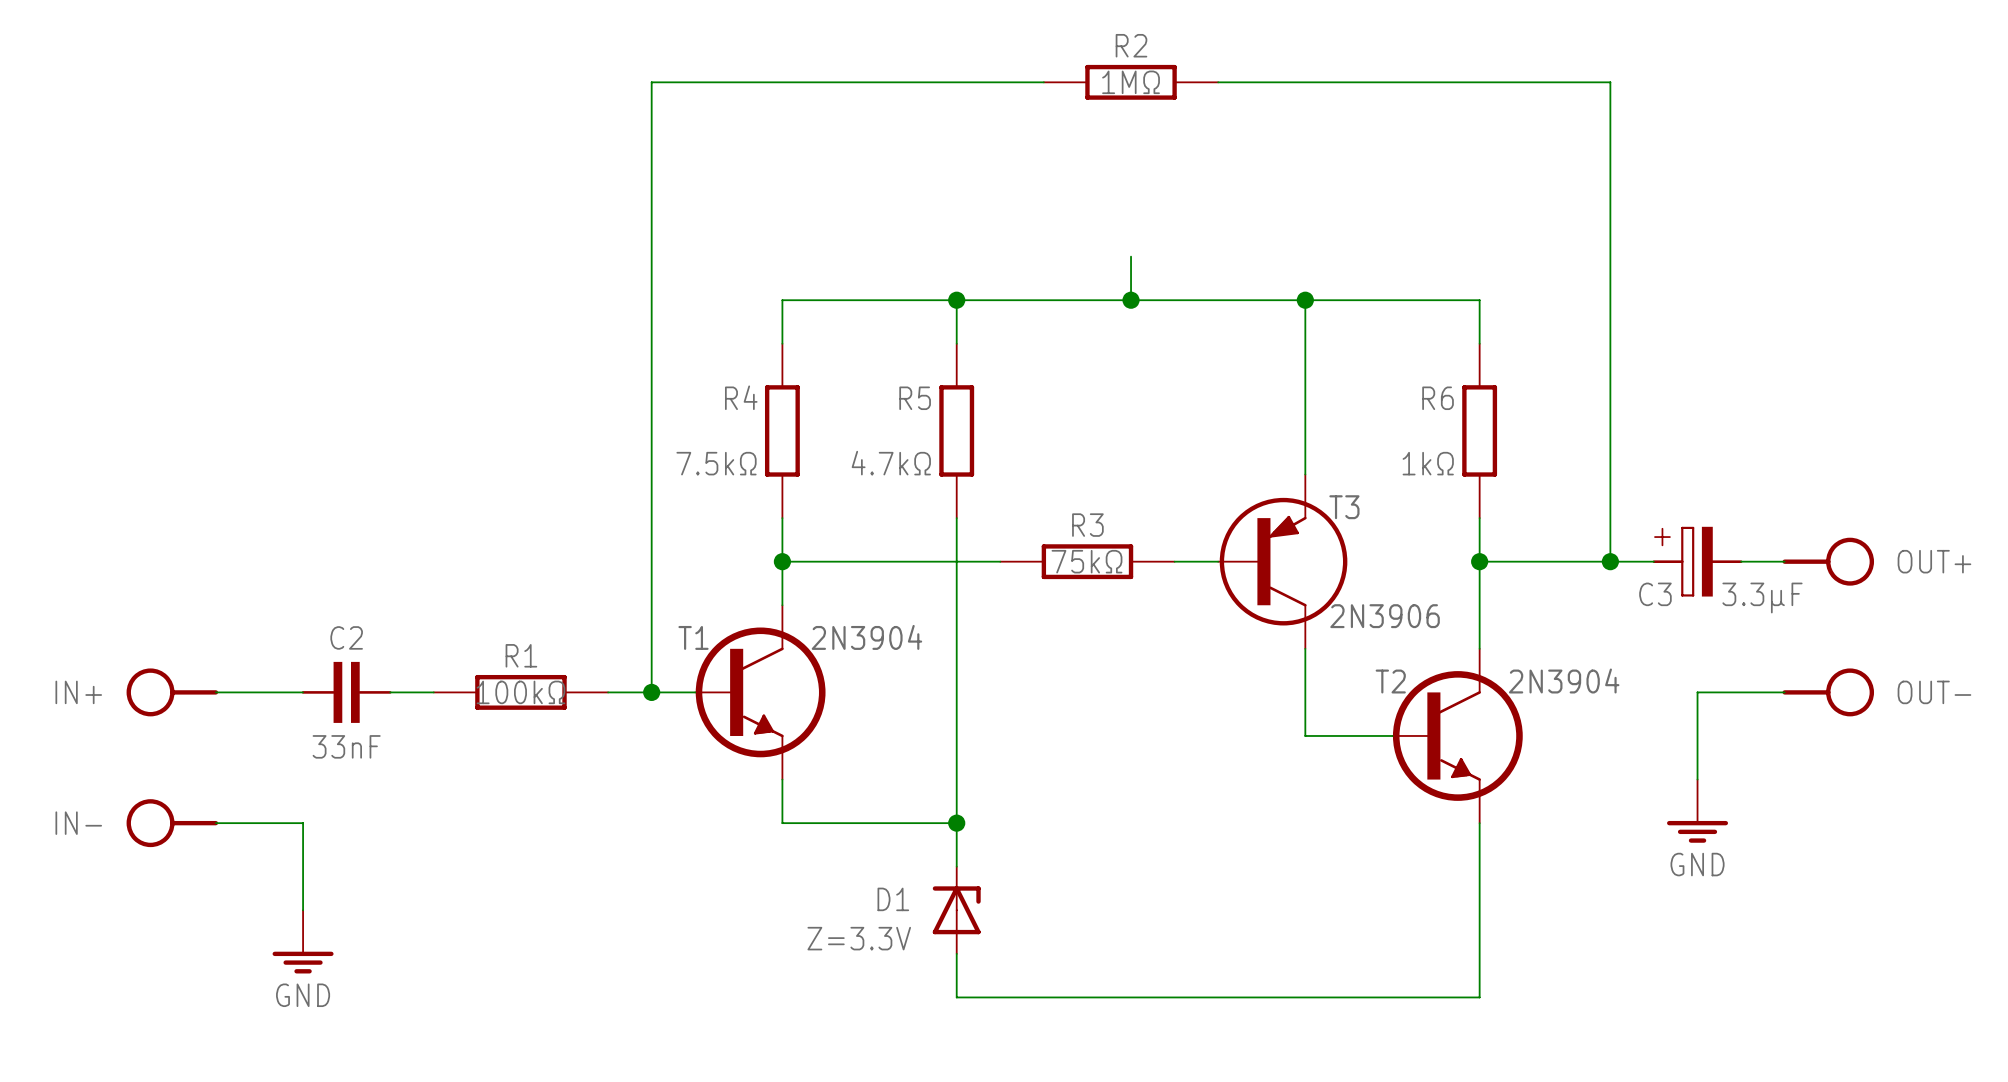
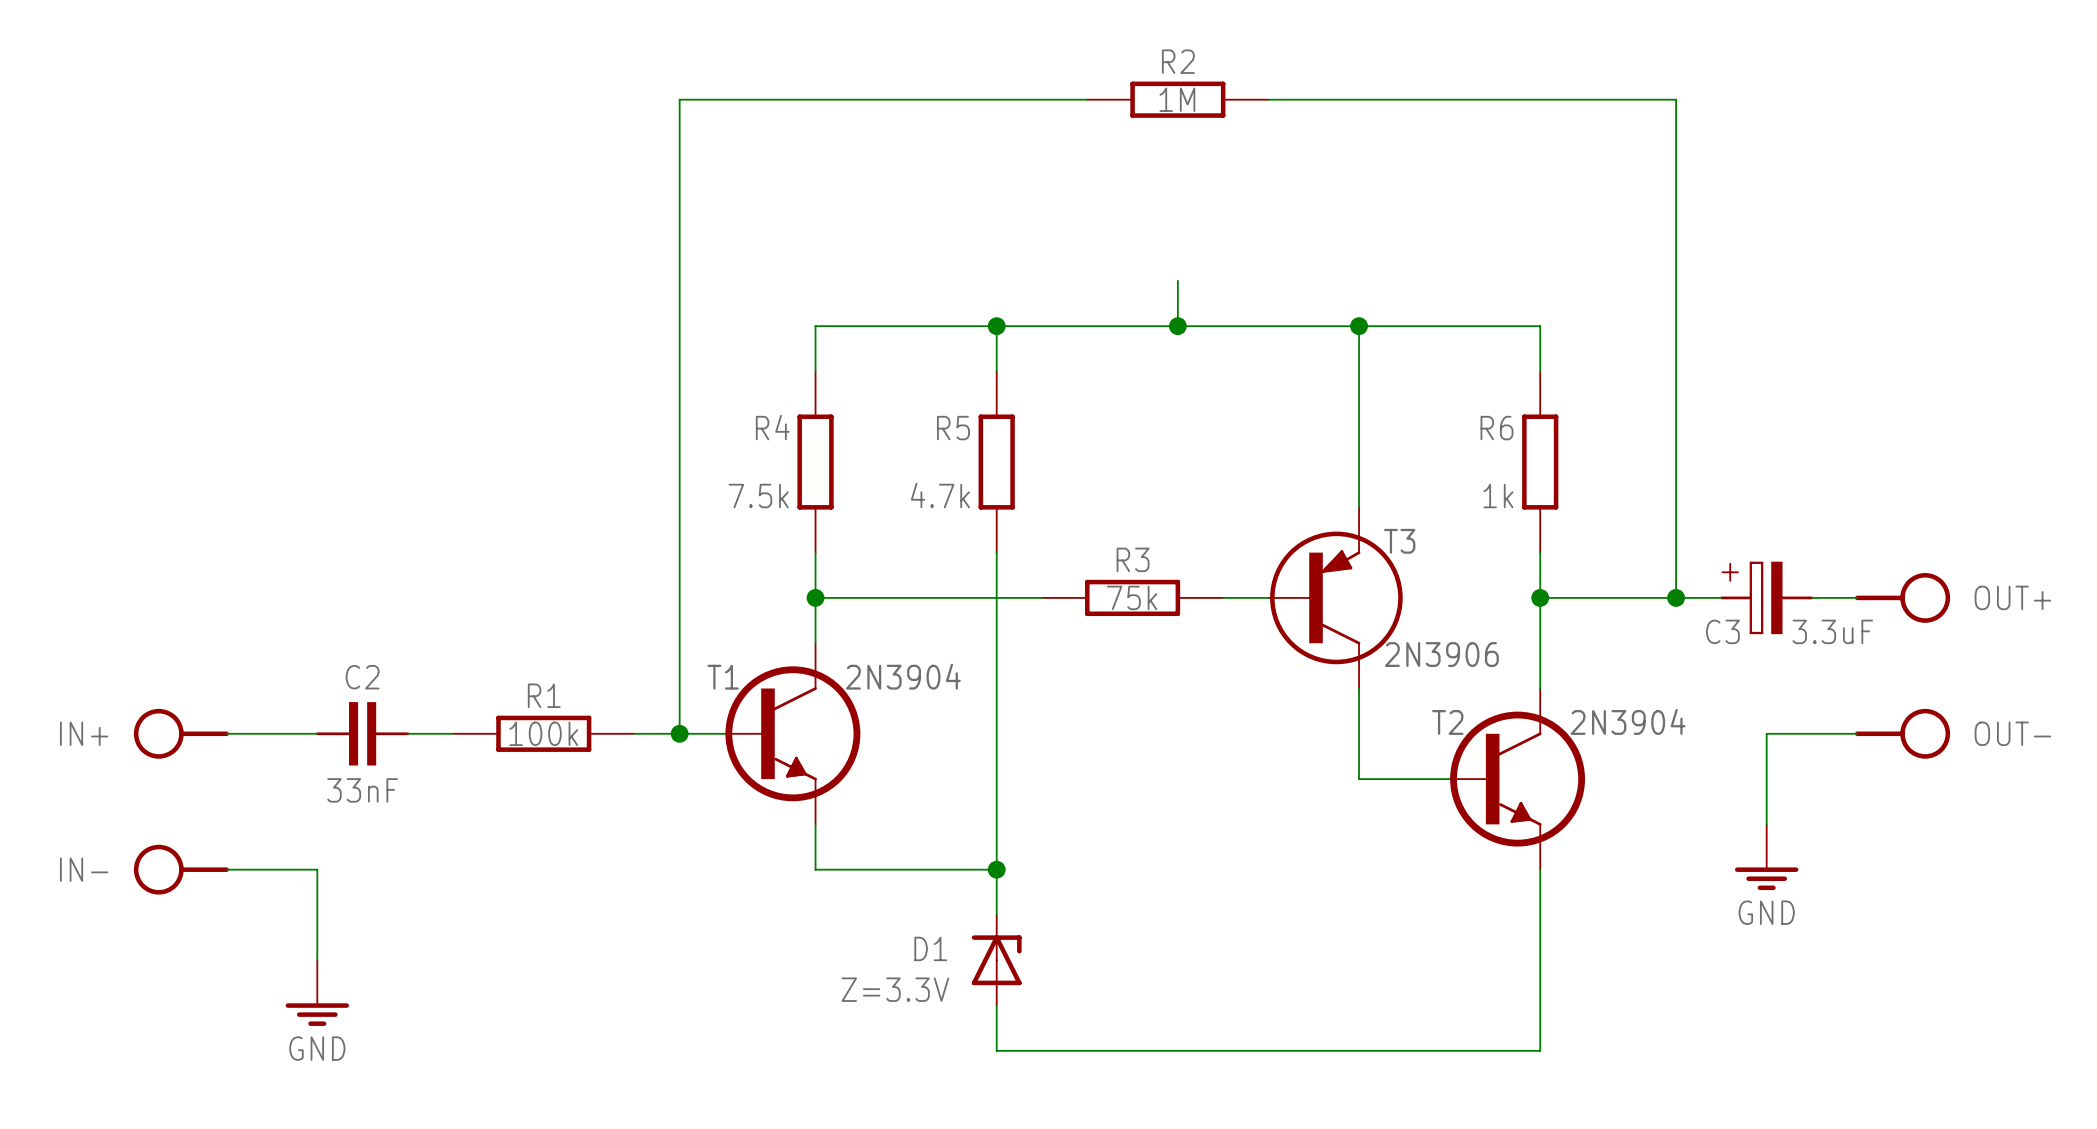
R2 value: 1MΩ (1131, 82) -> 1M (1177, 99)
R4 value: 7.5kΩ (716, 463) -> 7.5k (758, 496)
R5 value: 4.7kΩ (891, 463) -> 4.7k (940, 495)
R6 value: 1kΩ (1428, 463) -> 1k (1498, 496)
R3 value: 75kΩ (1086, 561) -> 75k (1132, 597)
C3 value: 3.3μF (1762, 597) -> 3.3uF (1832, 631)
R1 value: 100kΩ (520, 692) -> 100k (543, 733)

